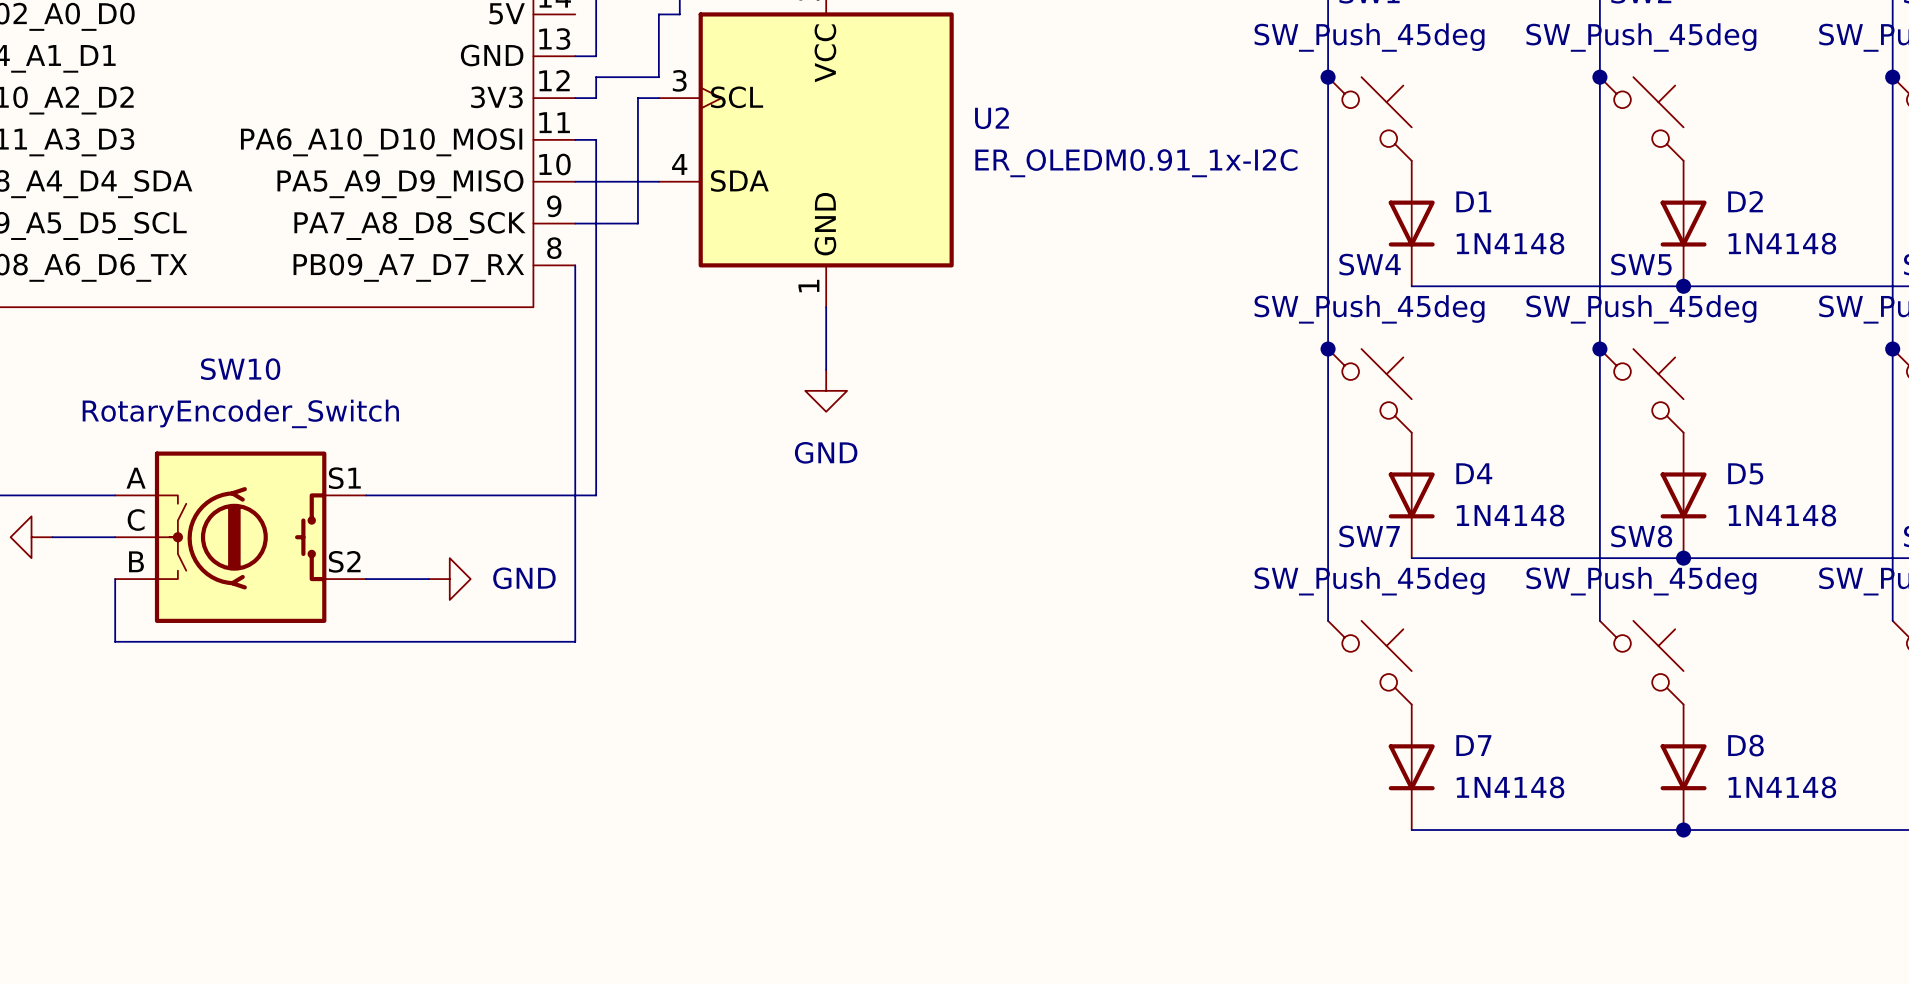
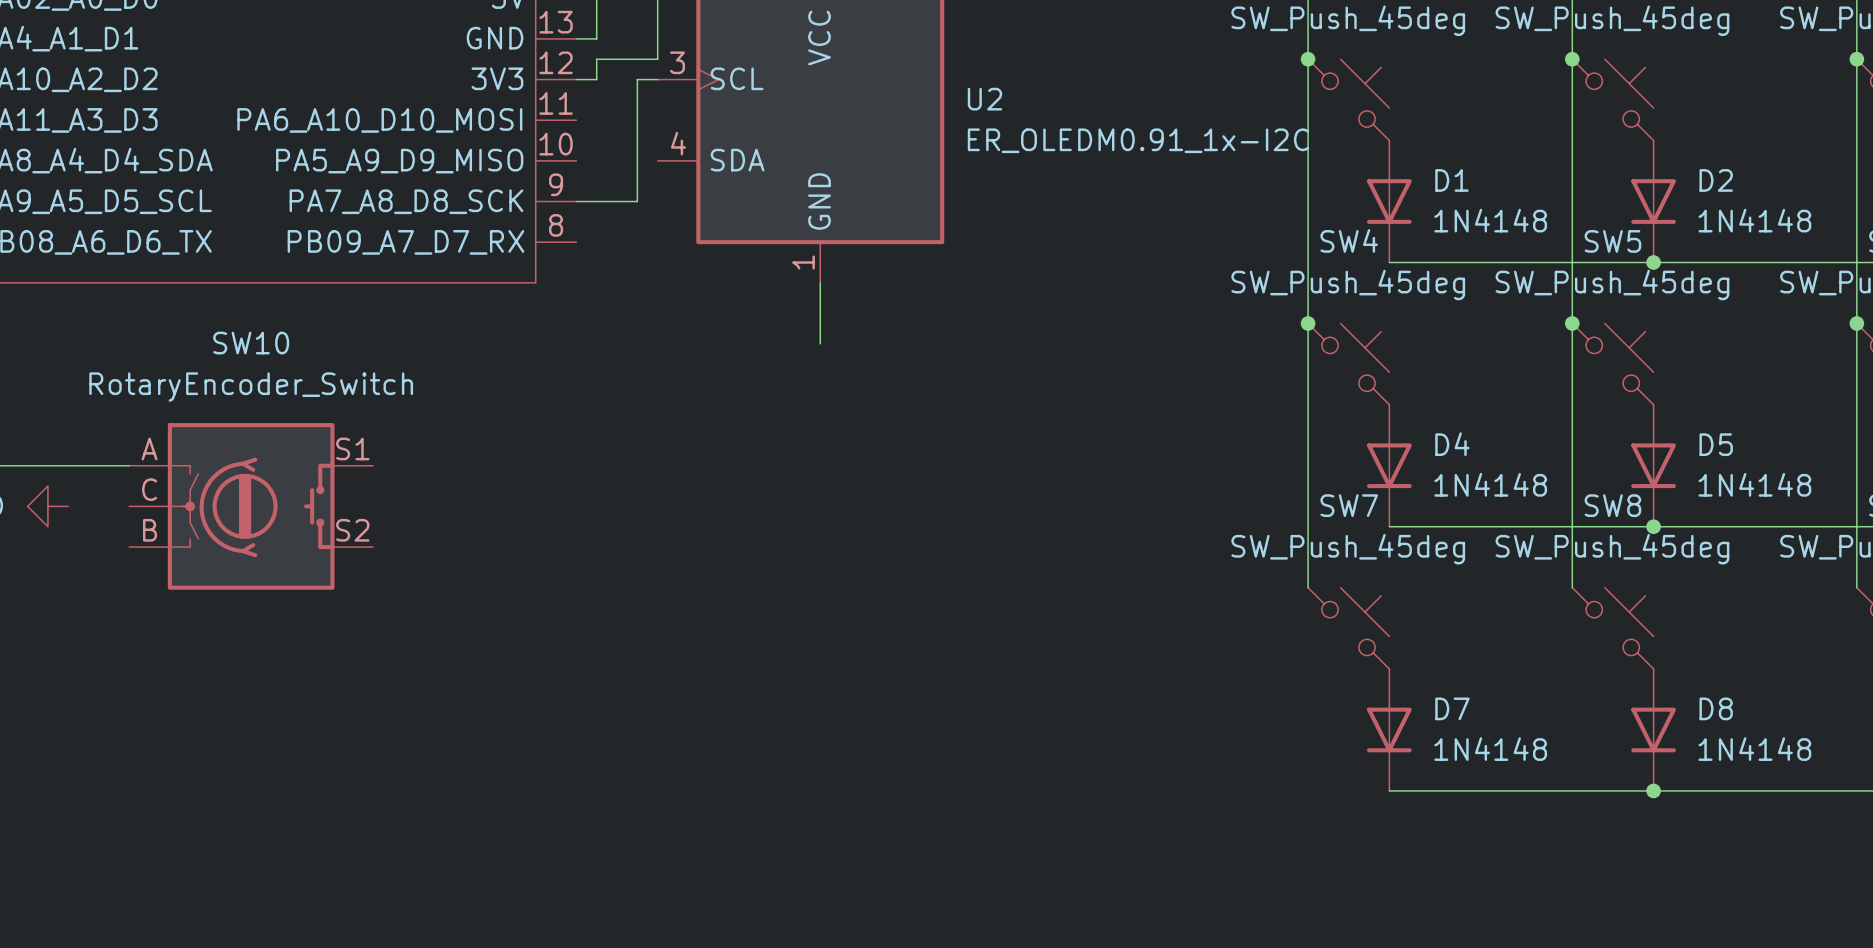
wire: (575, 139) (596, 139) (596, 495) (366, 495) -> none
wire: (575, 181) (658, 181) -> none
wire: (575, 265) (575, 641) (115, 641) (115, 579) -> none
power symbol: GND (826, 390) -> none
wire: (52, 537) (115, 537) -> none
wire: (366, 579) (428, 579) -> none
power symbol: GND (449, 579) -> none

